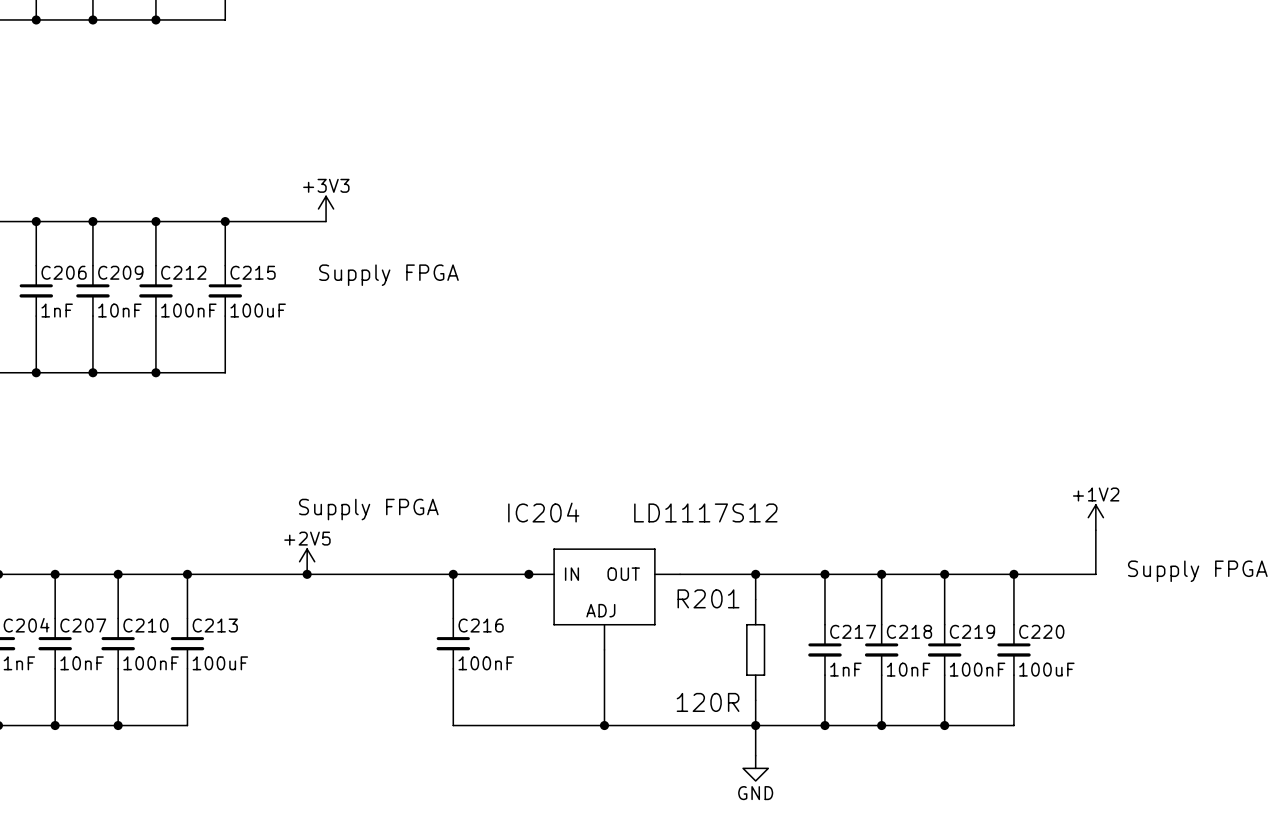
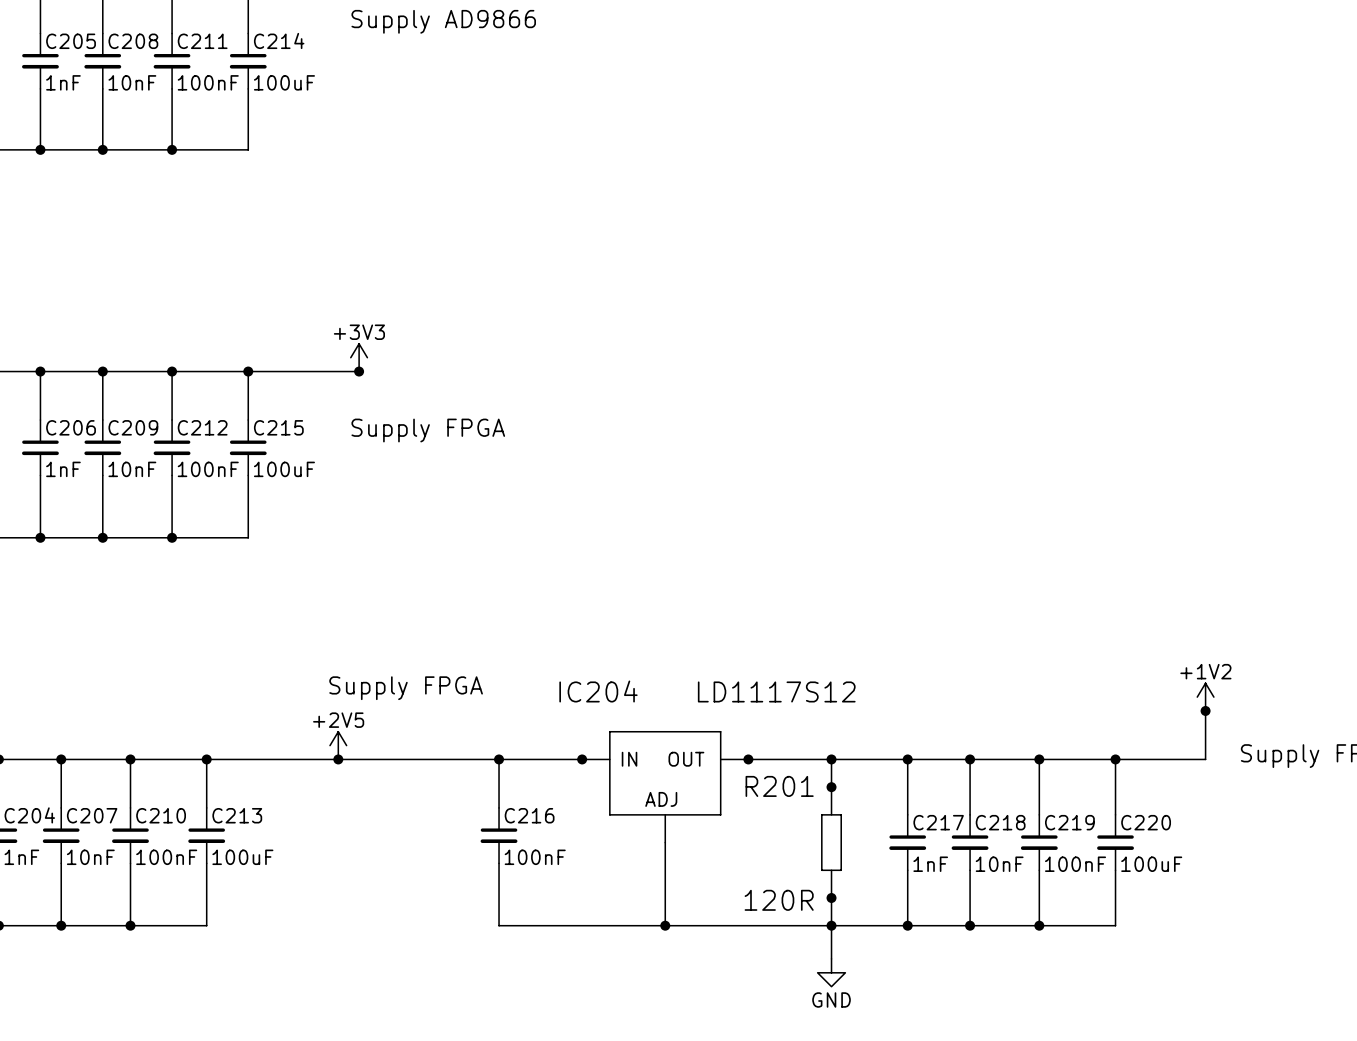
junction: none -> (359, 371)
junction: none -> (1205, 710)
junction: none -> (748, 759)
junction: none -> (831, 787)
junction: none -> (831, 897)

